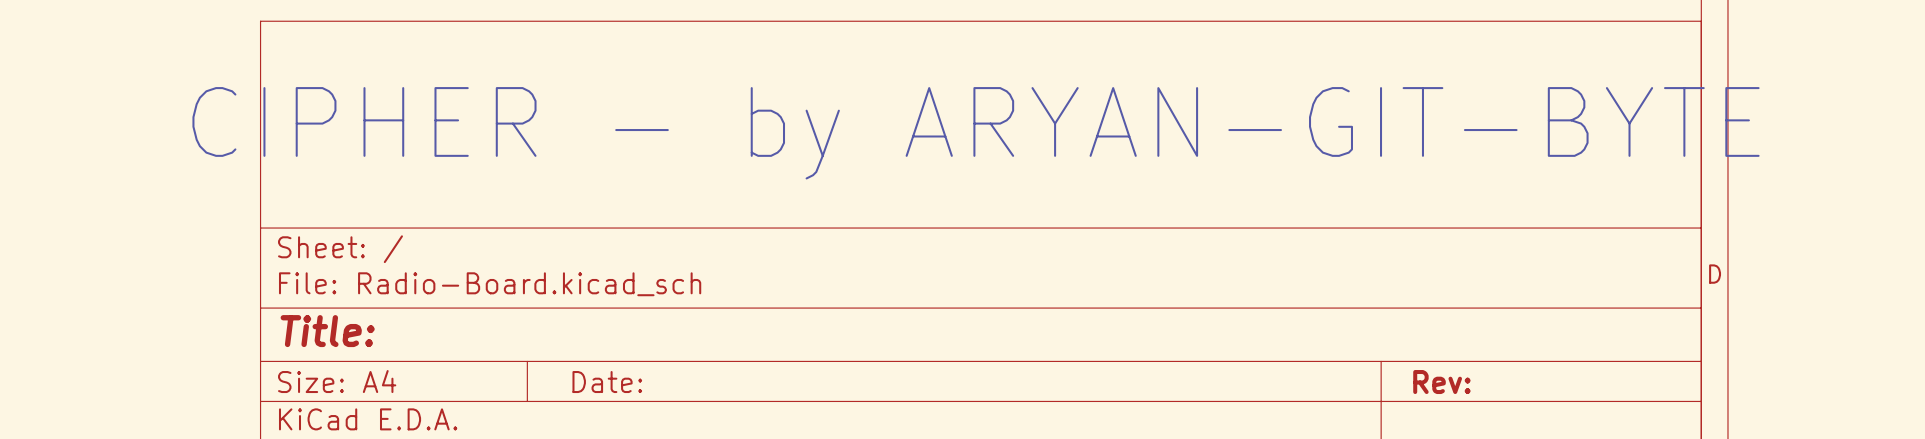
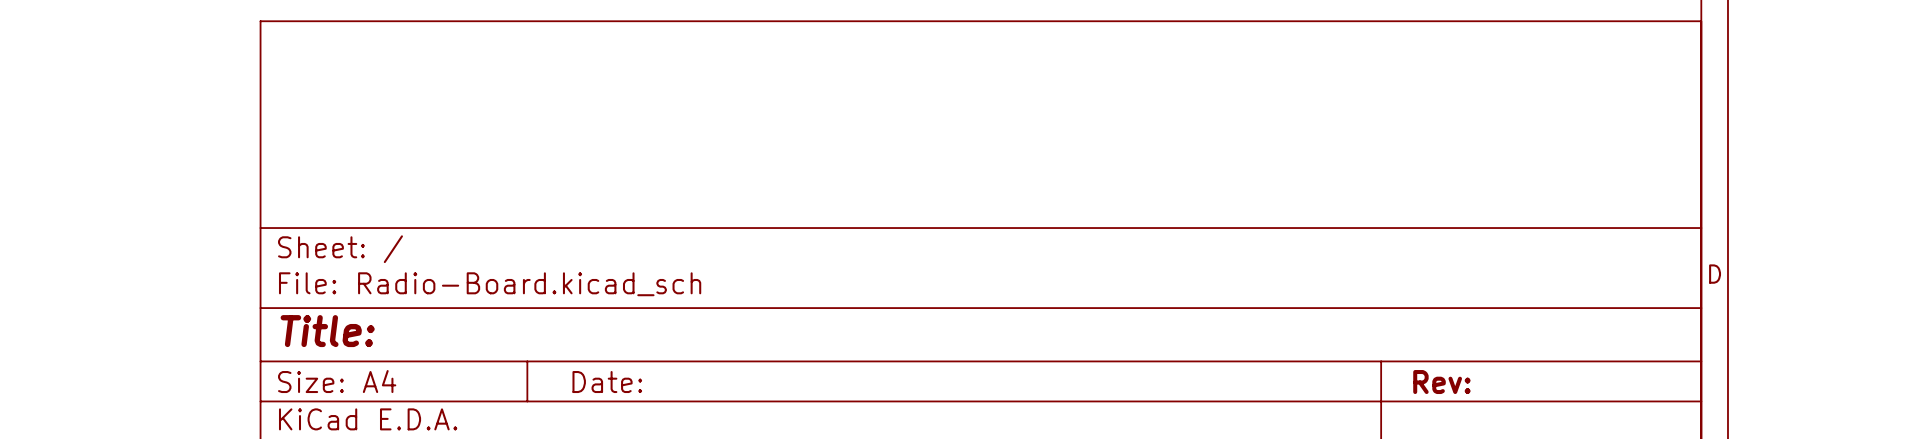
text: CIPHER - by ARYAN-GIT-BYTE (976, 133) -> none

